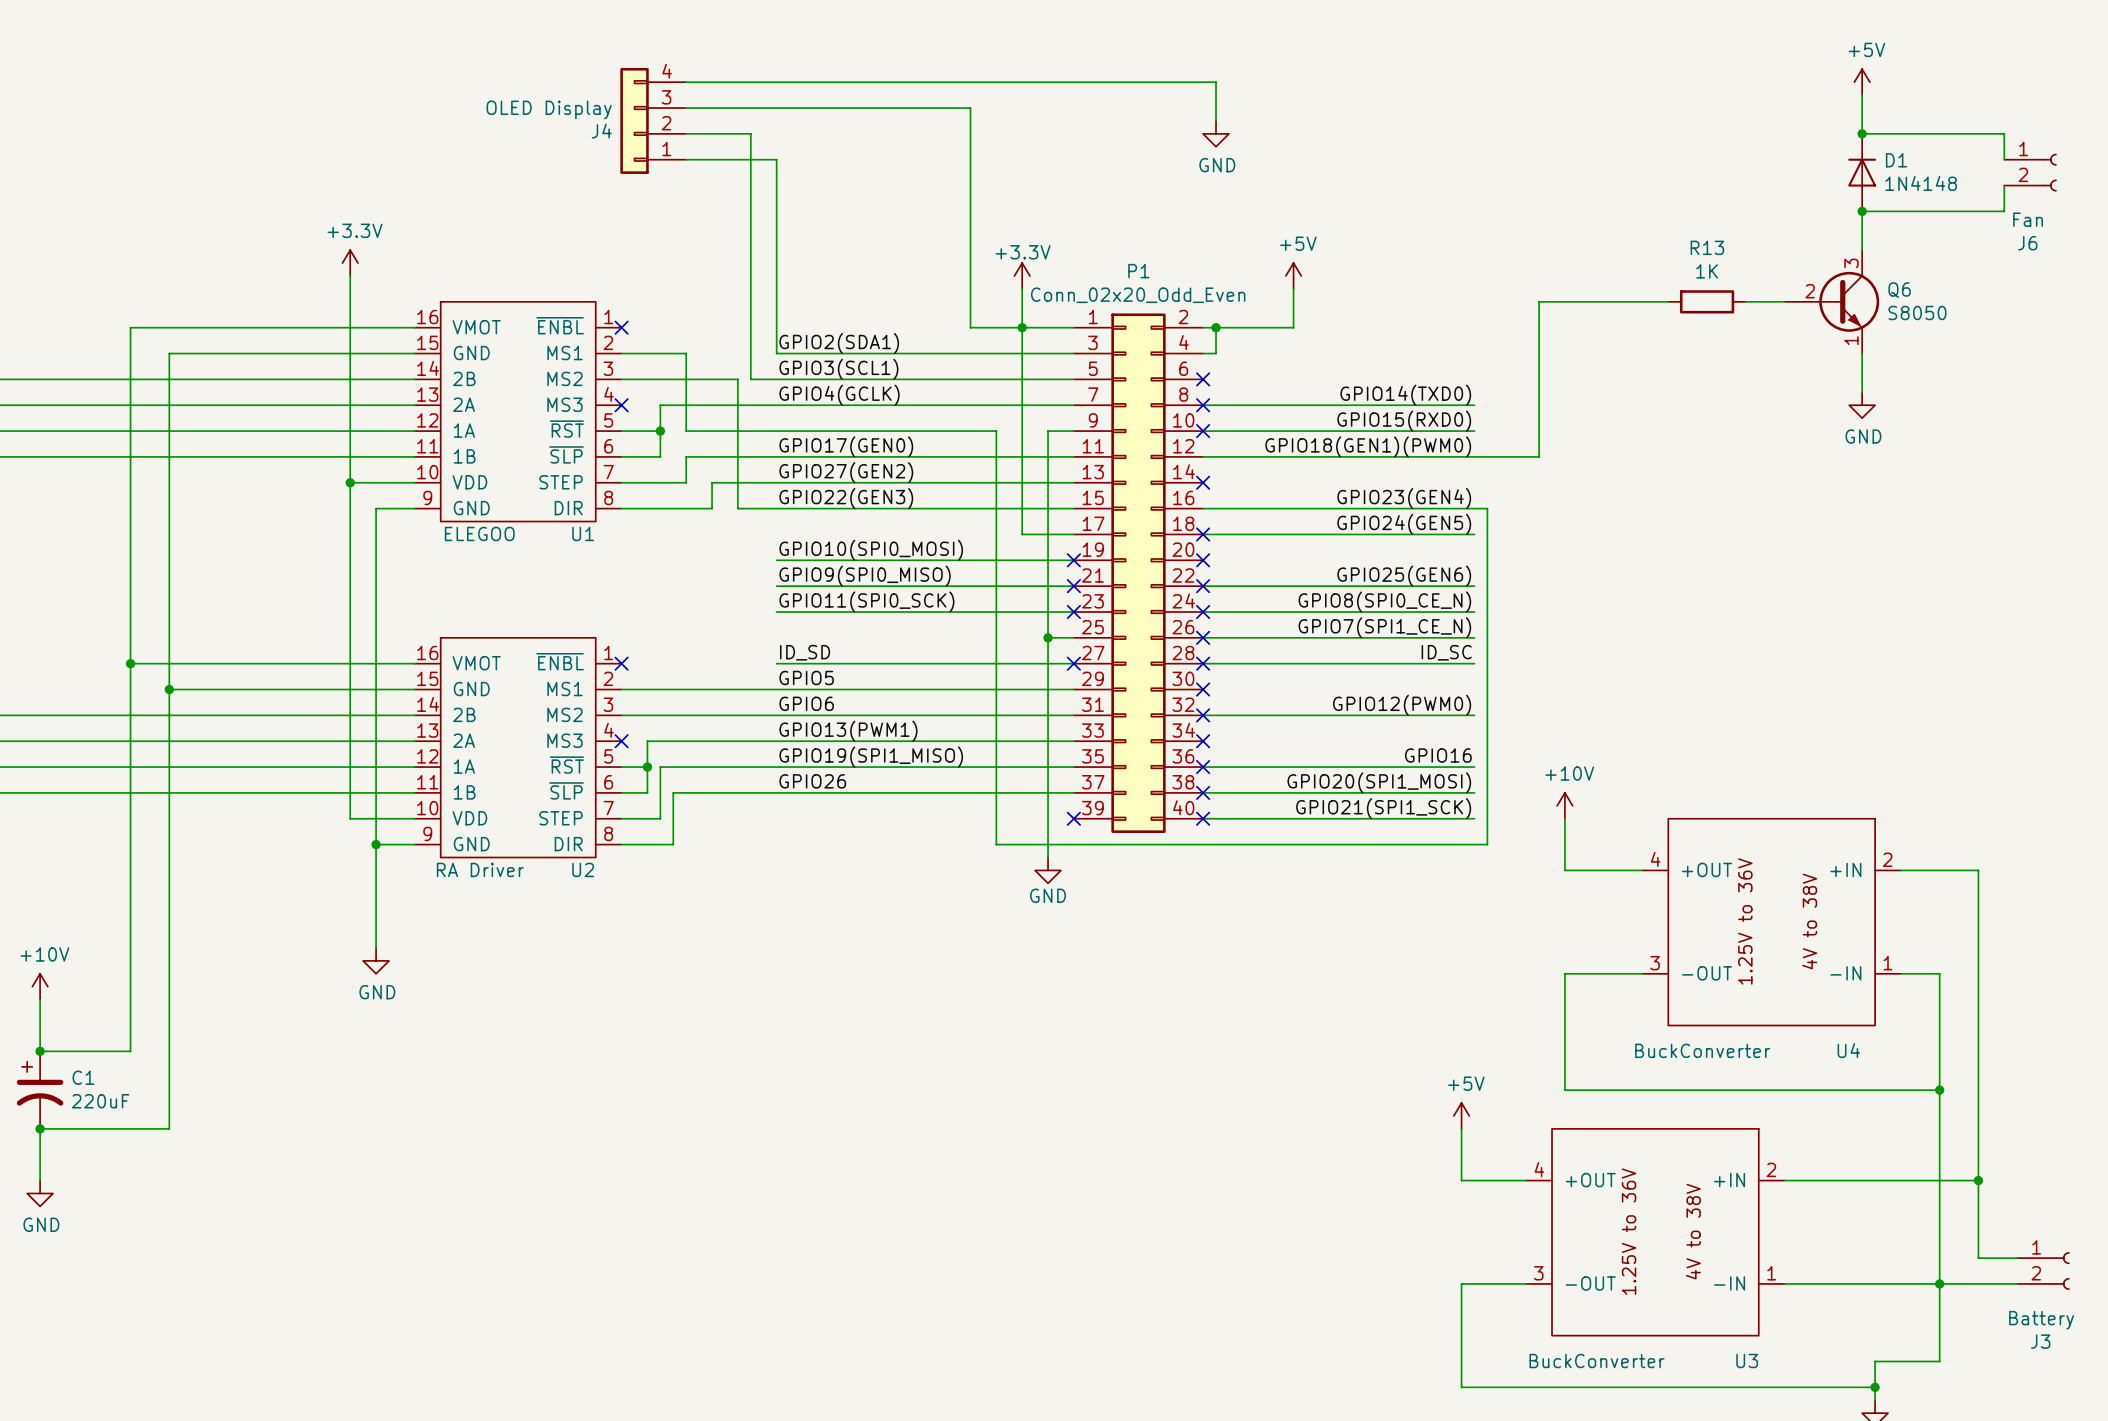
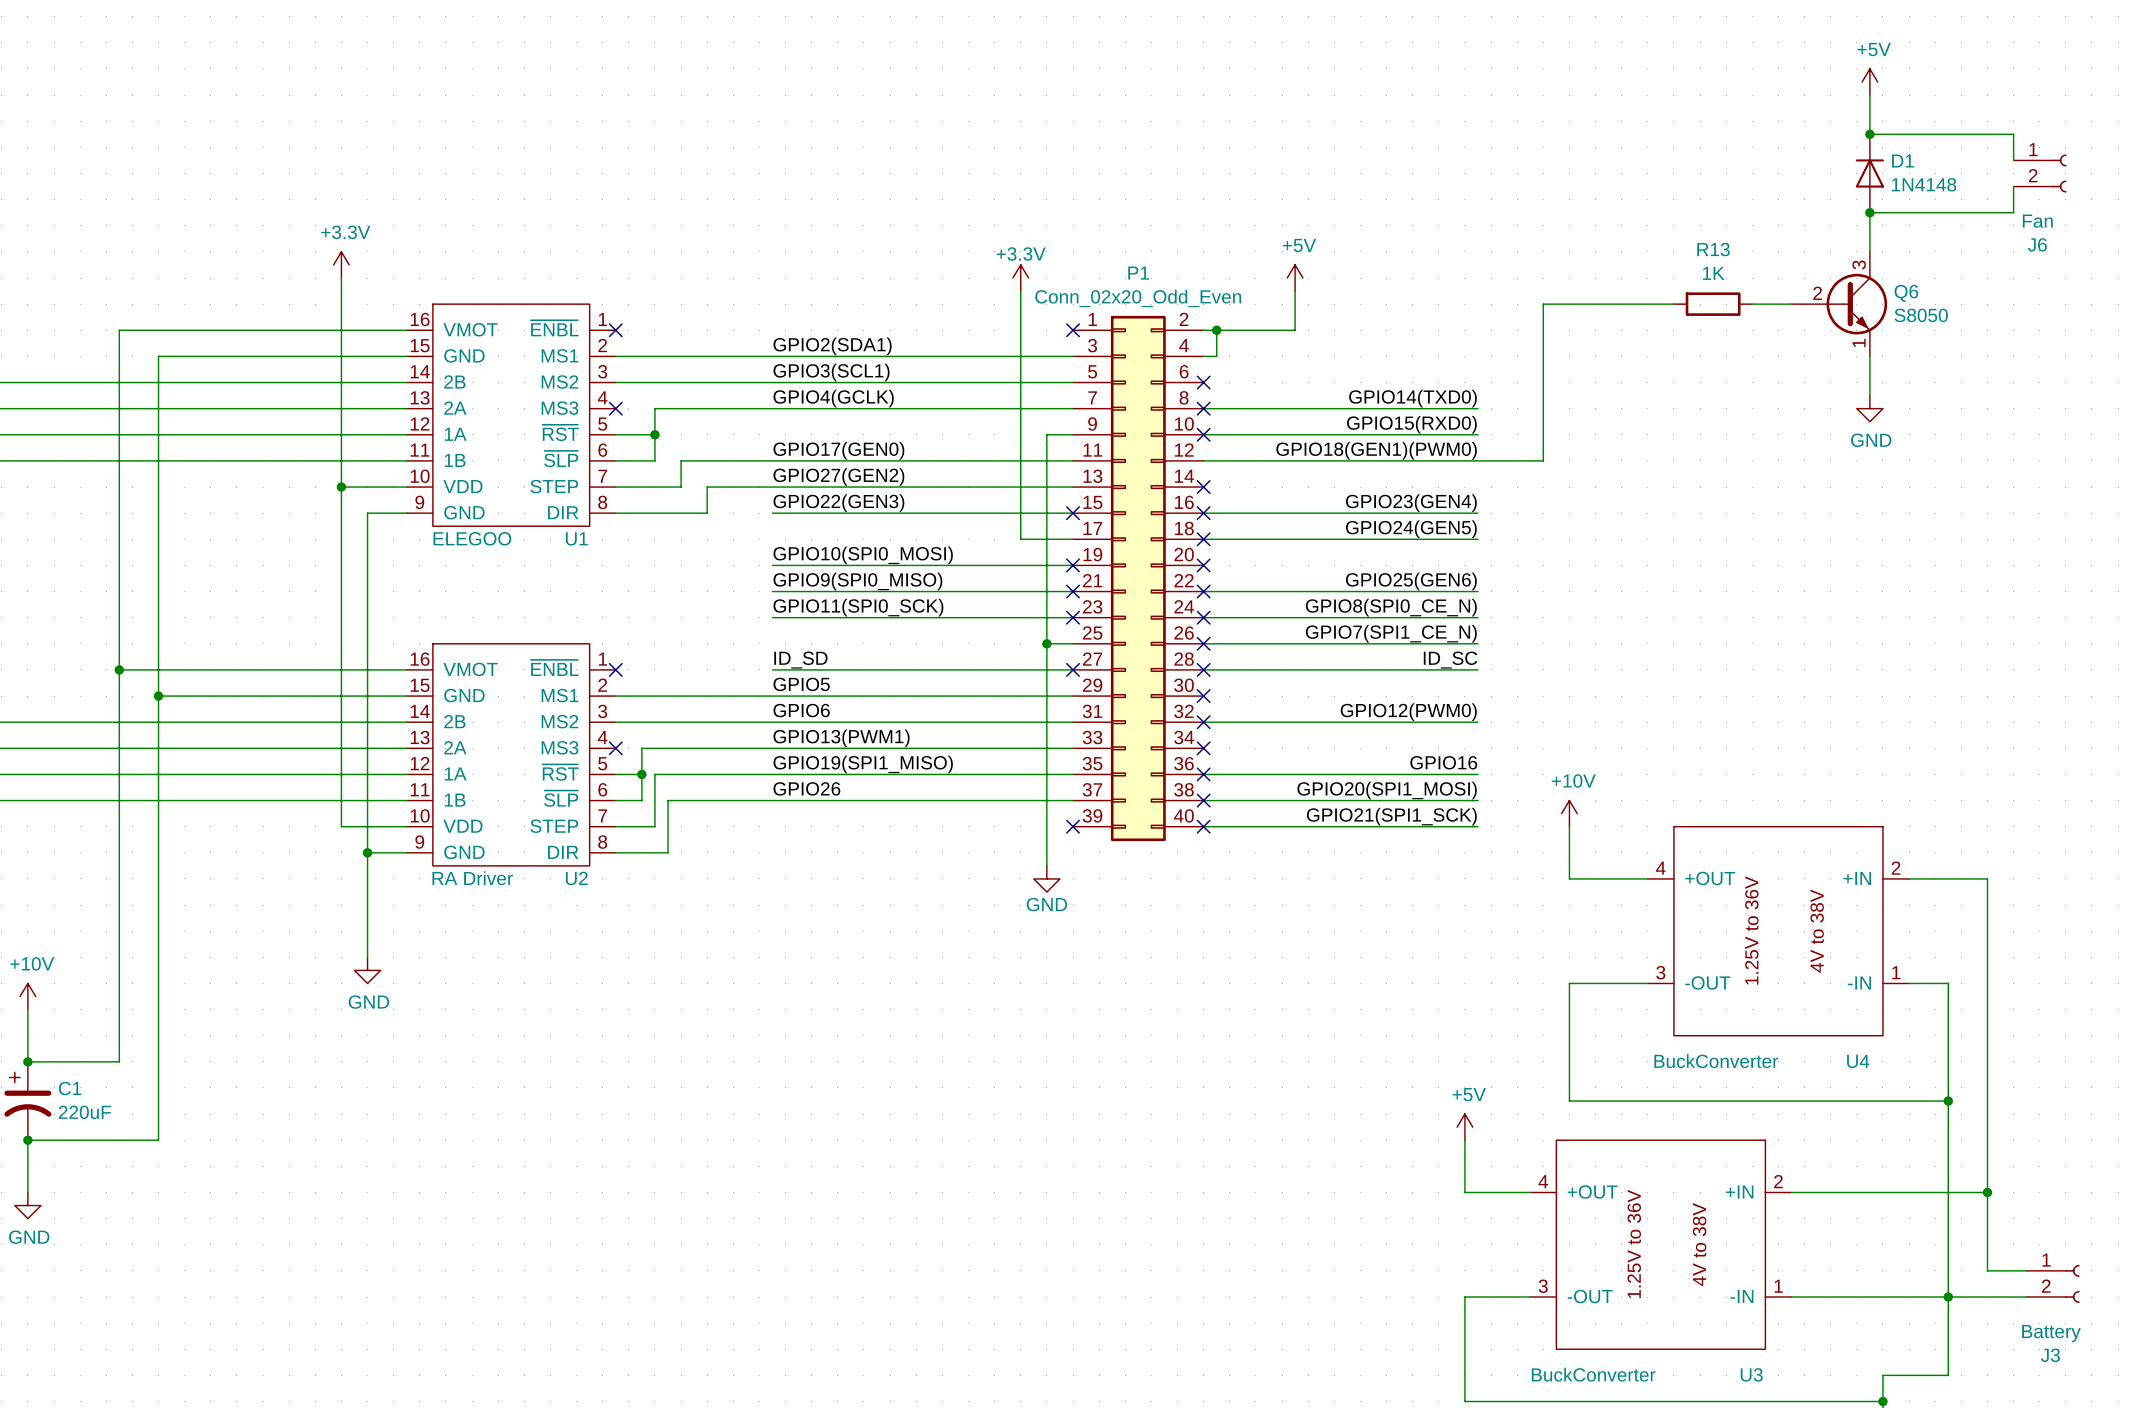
wire: (686, 82) (1216, 82) (1216, 120) -> none
wire: (686, 108) (970, 108) (970, 327) (1073, 327) -> none
J4: OLED Display (653, 120) -> none
wire: (686, 133) (750, 133) (750, 379) -> none
power symbol: GND (1216, 133) -> none
wire: (686, 159) (776, 159) (776, 353) -> (681, 356) (772, 356)
junction: (1022, 327) -> none
no-connect mark: none -> (1073, 330)
wire: (686, 353) (686, 431) (996, 431) (996, 844) (1487, 844) (1487, 508) (1474, 508) -> none
wire: (737, 379) (737, 508) (776, 508) -> (733, 382) (746, 382)
no-connect mark: none -> (1073, 513)
no-connect mark: none -> (1203, 513)

